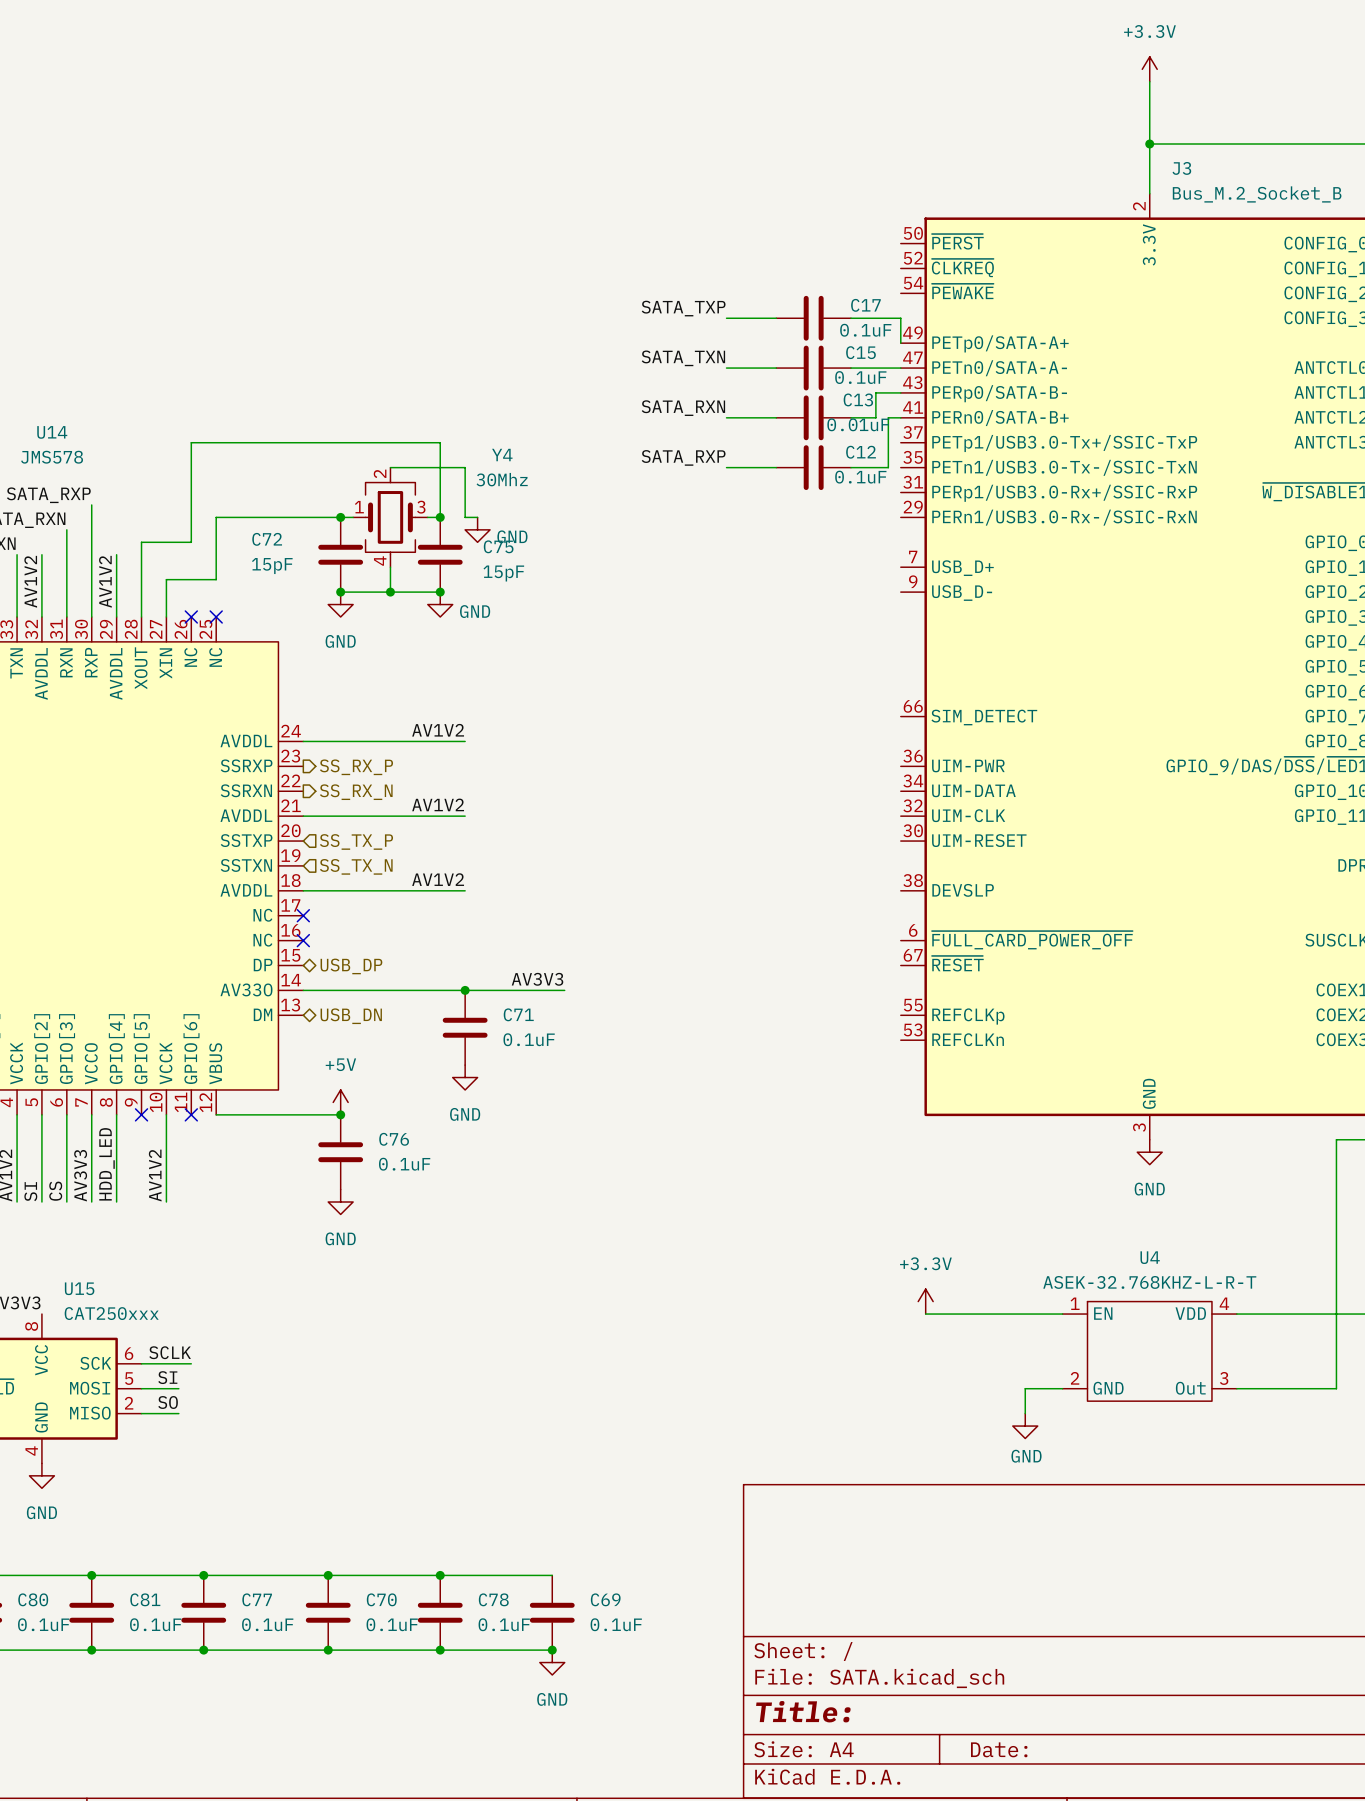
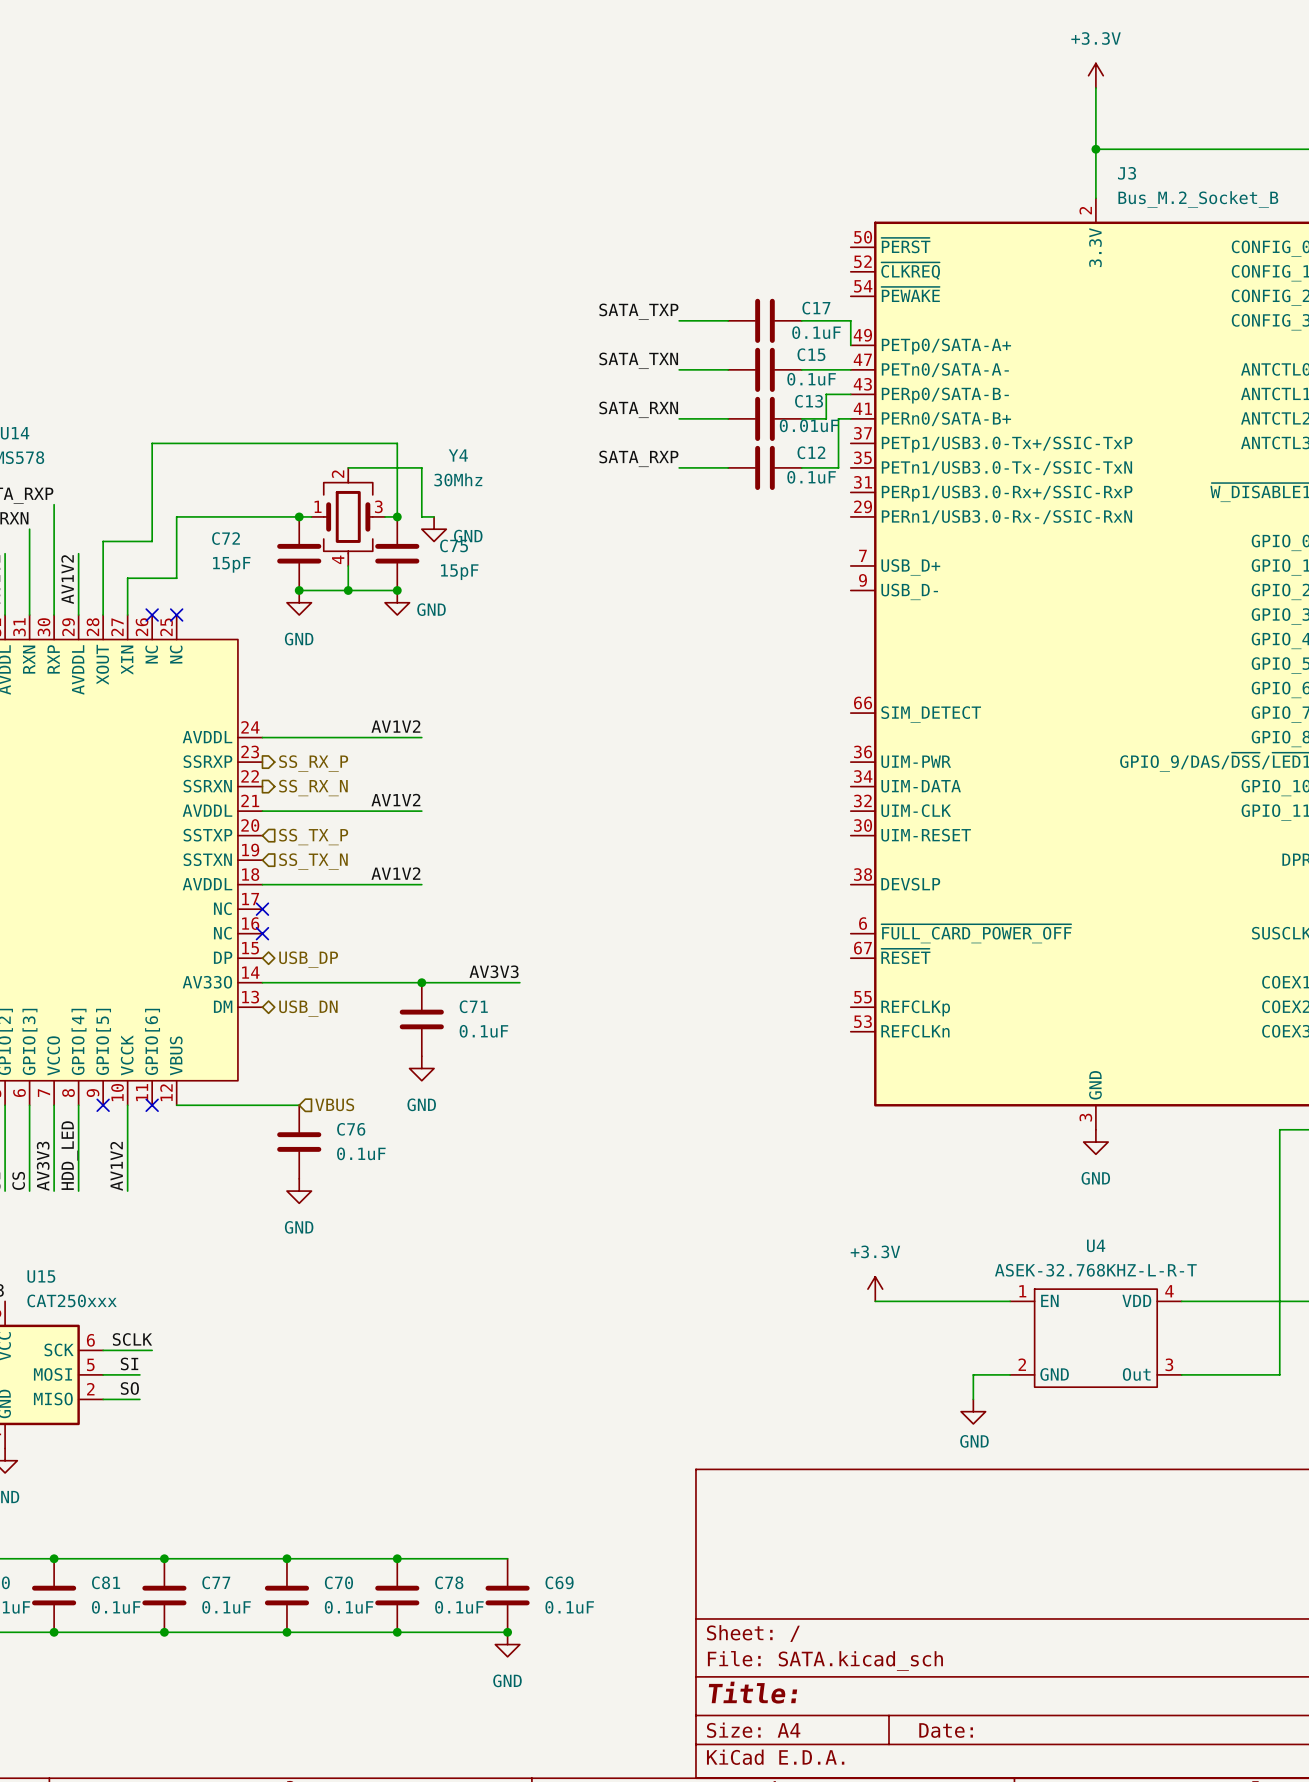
power symbol: +5V (340, 1102) -> none
junction: (340, 1114) -> none
hierarchical label: none -> VBUS (334, 1104)

